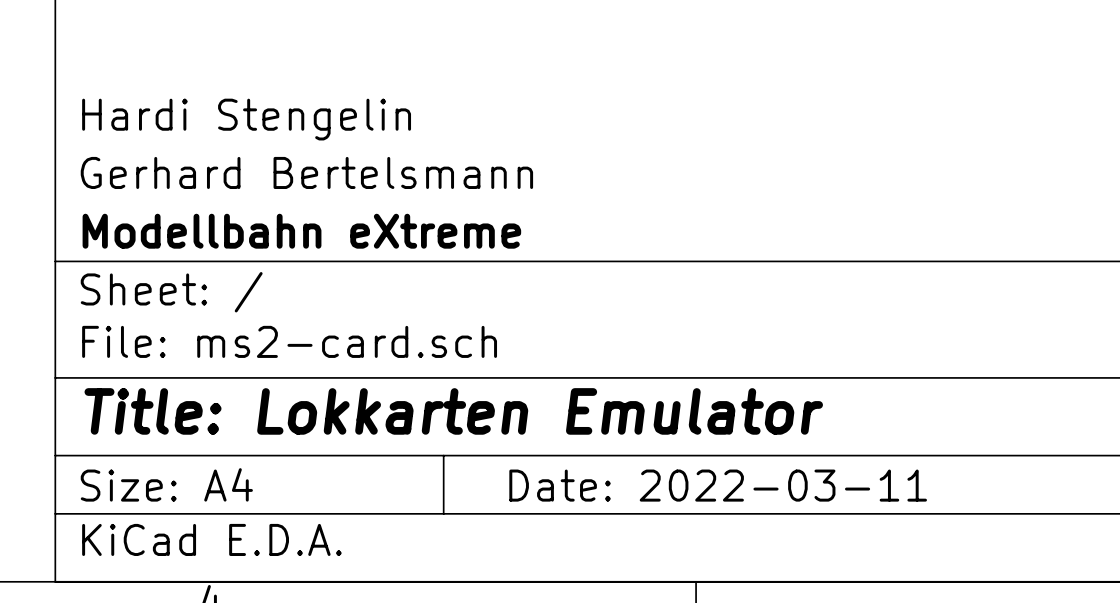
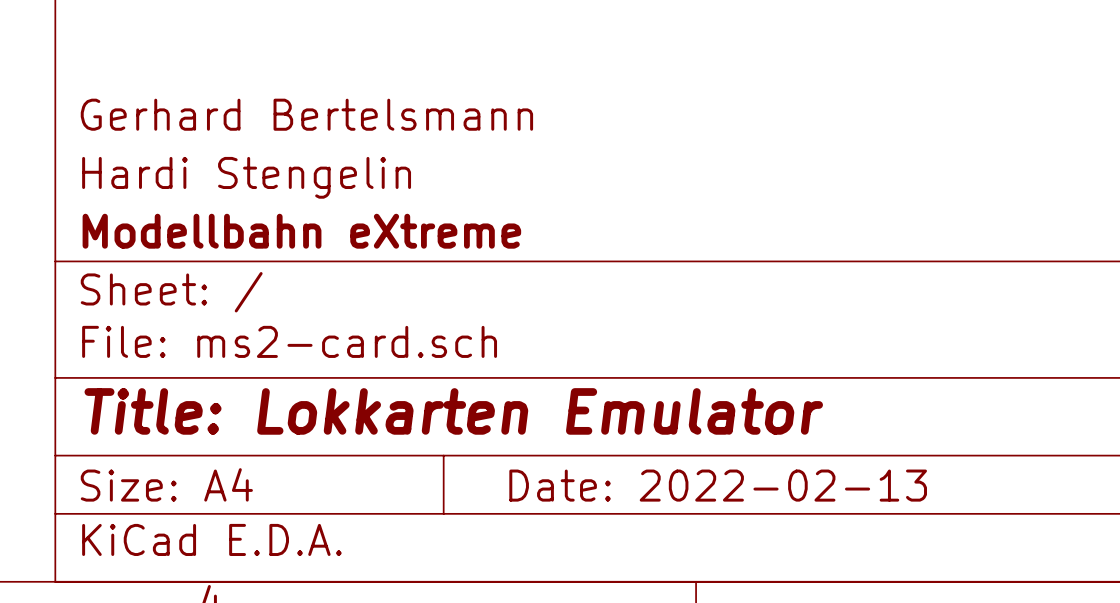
title block: Hardi Stengelin (246, 119) -> Gerhard Bertelsmann (306, 114)
title block: Gerhard Bertelsmann (306, 172) -> Hardi Stengelin (246, 177)
title block: Date: 2022-03-11 (718, 485) -> Date: 2022-02-13 (718, 485)

